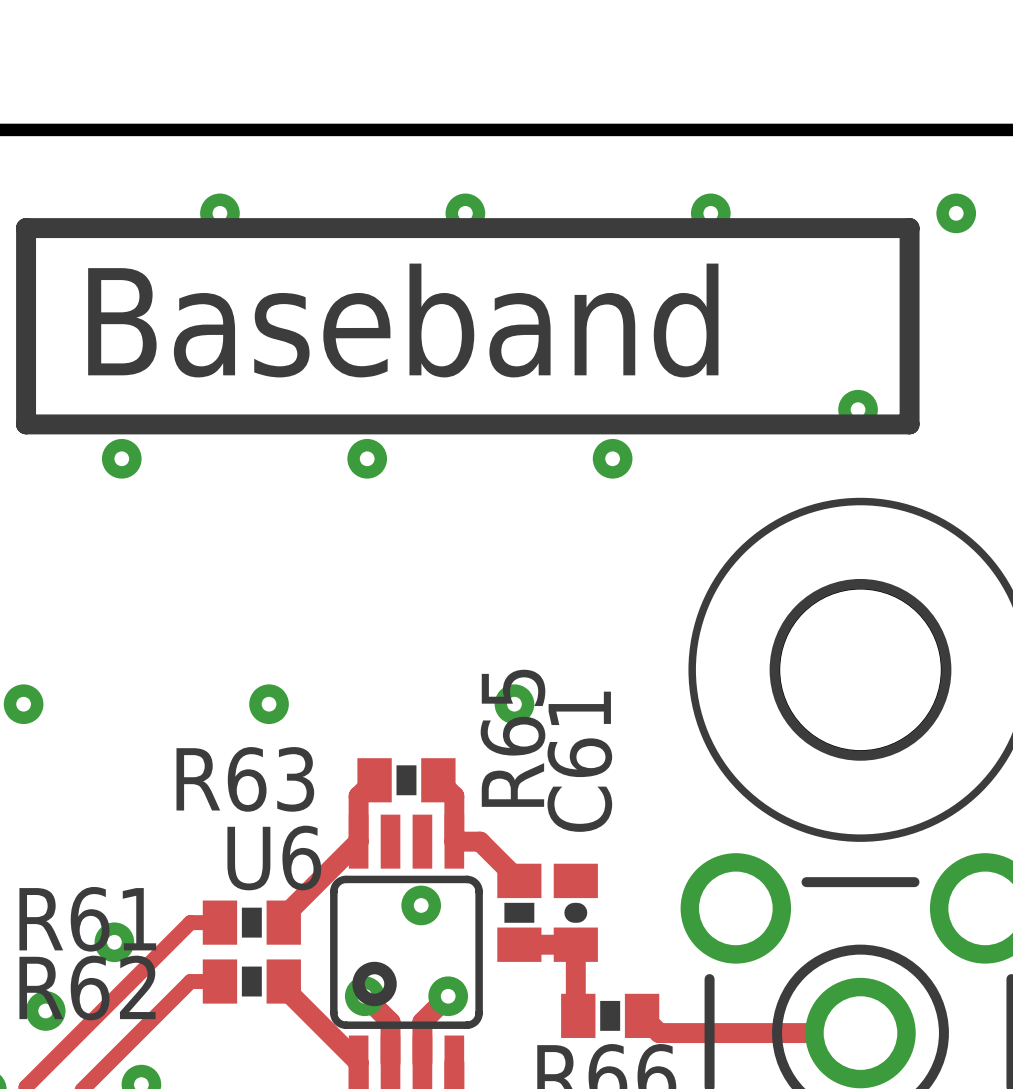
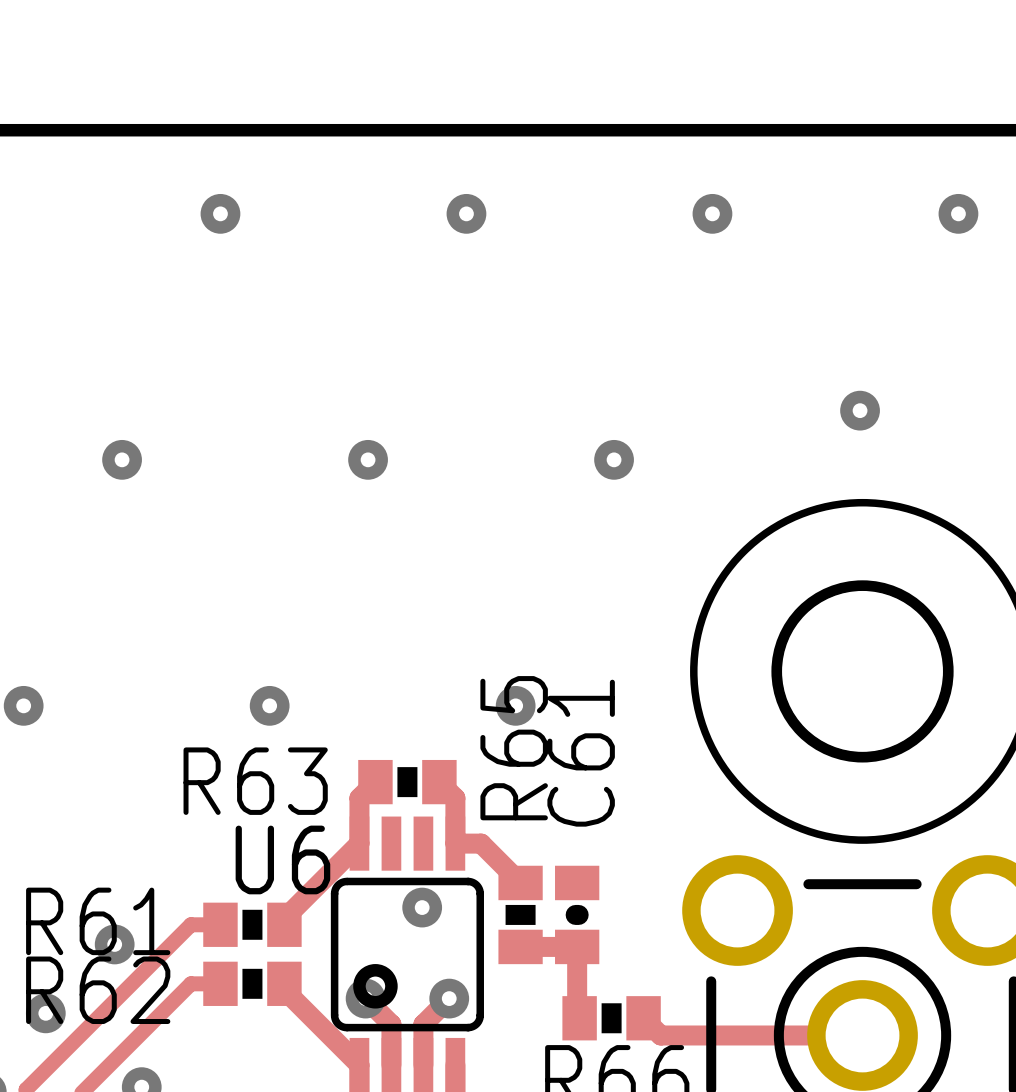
line: (26, 228) (909, 228) (909, 424) (26, 424) (26, 228) -> none
text: Baseband (403, 320) -> none

